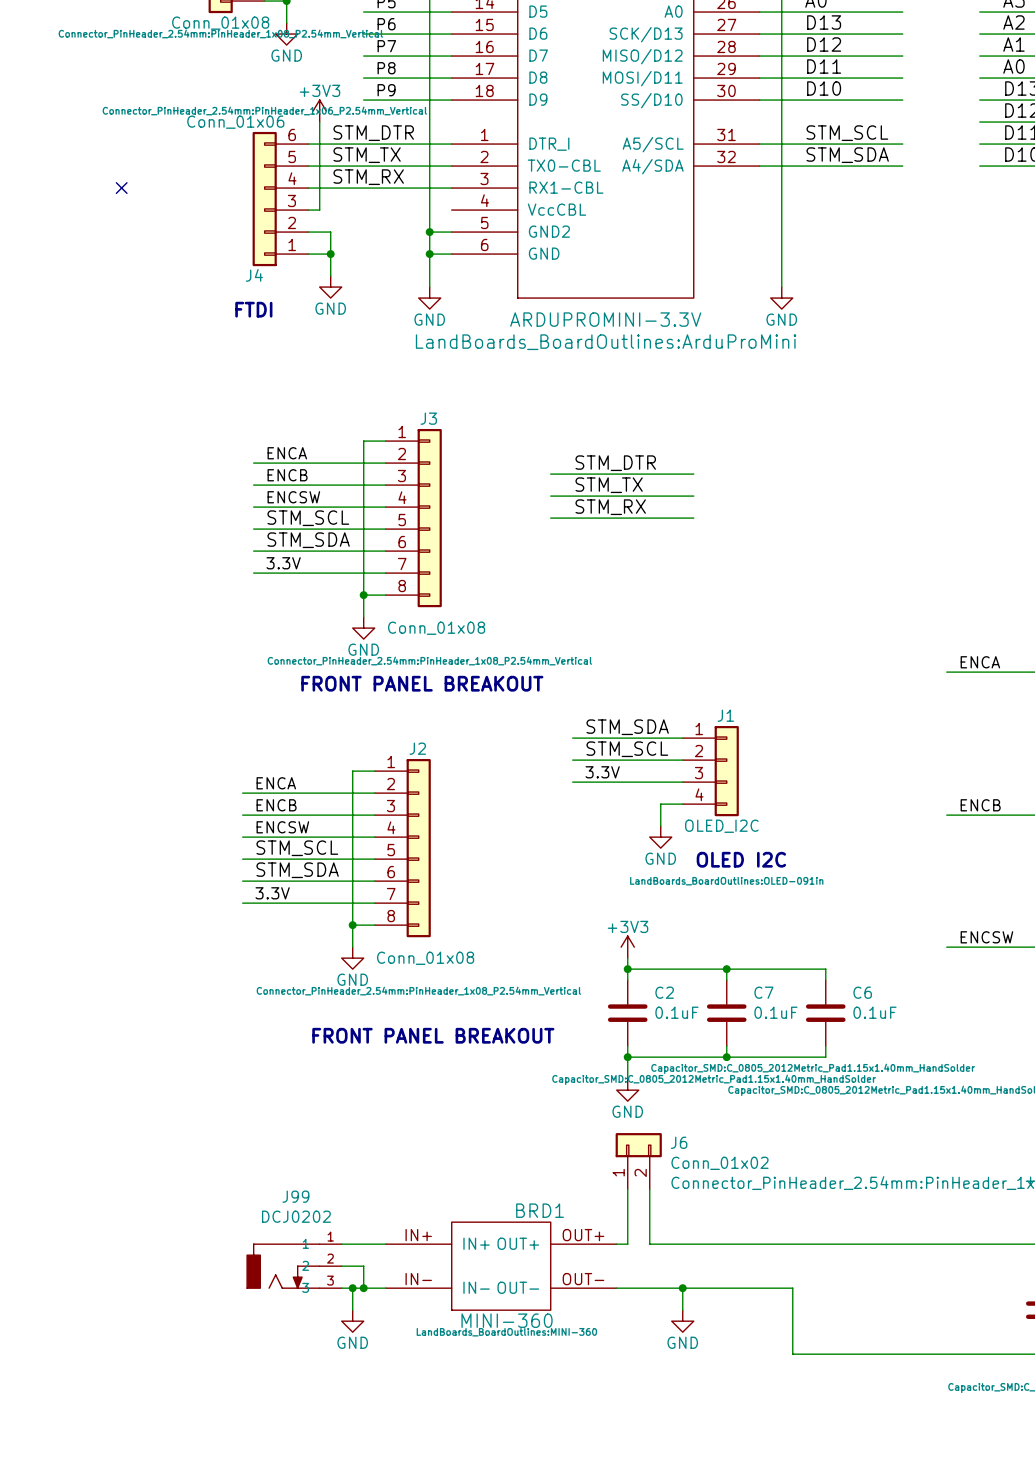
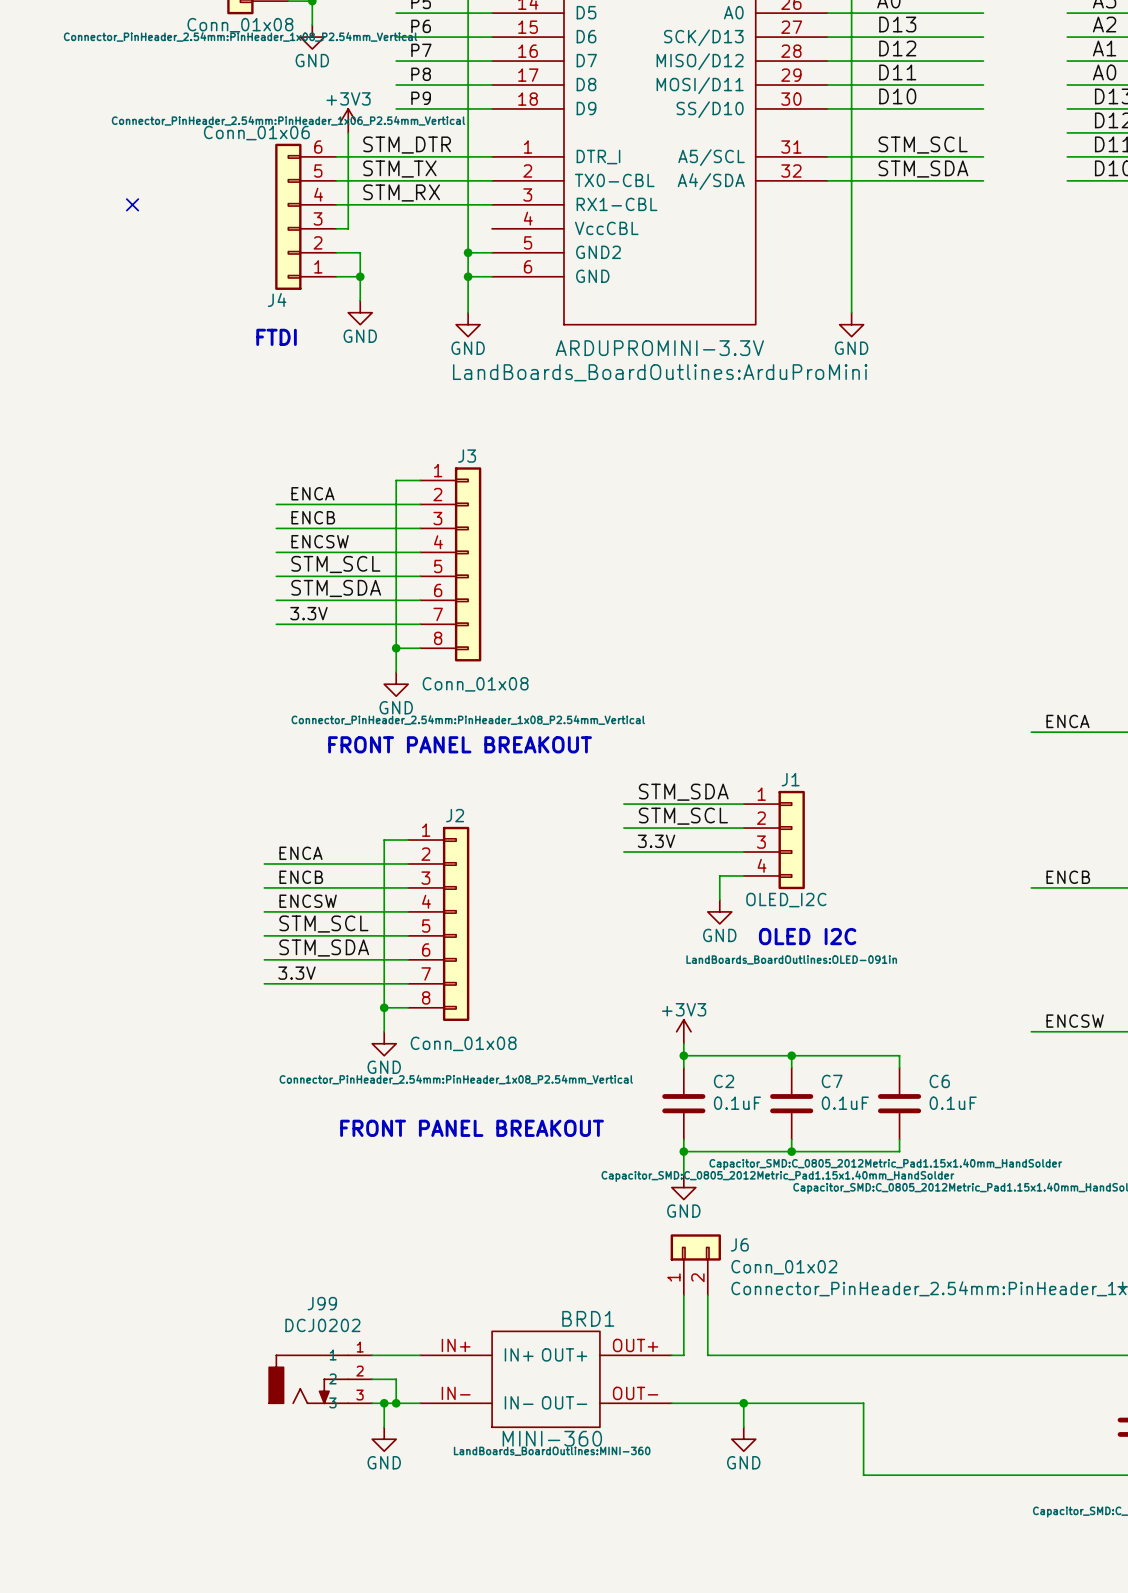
label: STM_DTR (615, 463) -> none
wire: (550, 474) (693, 474) -> none
label: STM_TX (609, 485) -> none
wire: (550, 496) (693, 496) -> none
label: STM_RX (610, 507) -> none
wire: (550, 518) (693, 518) -> none

